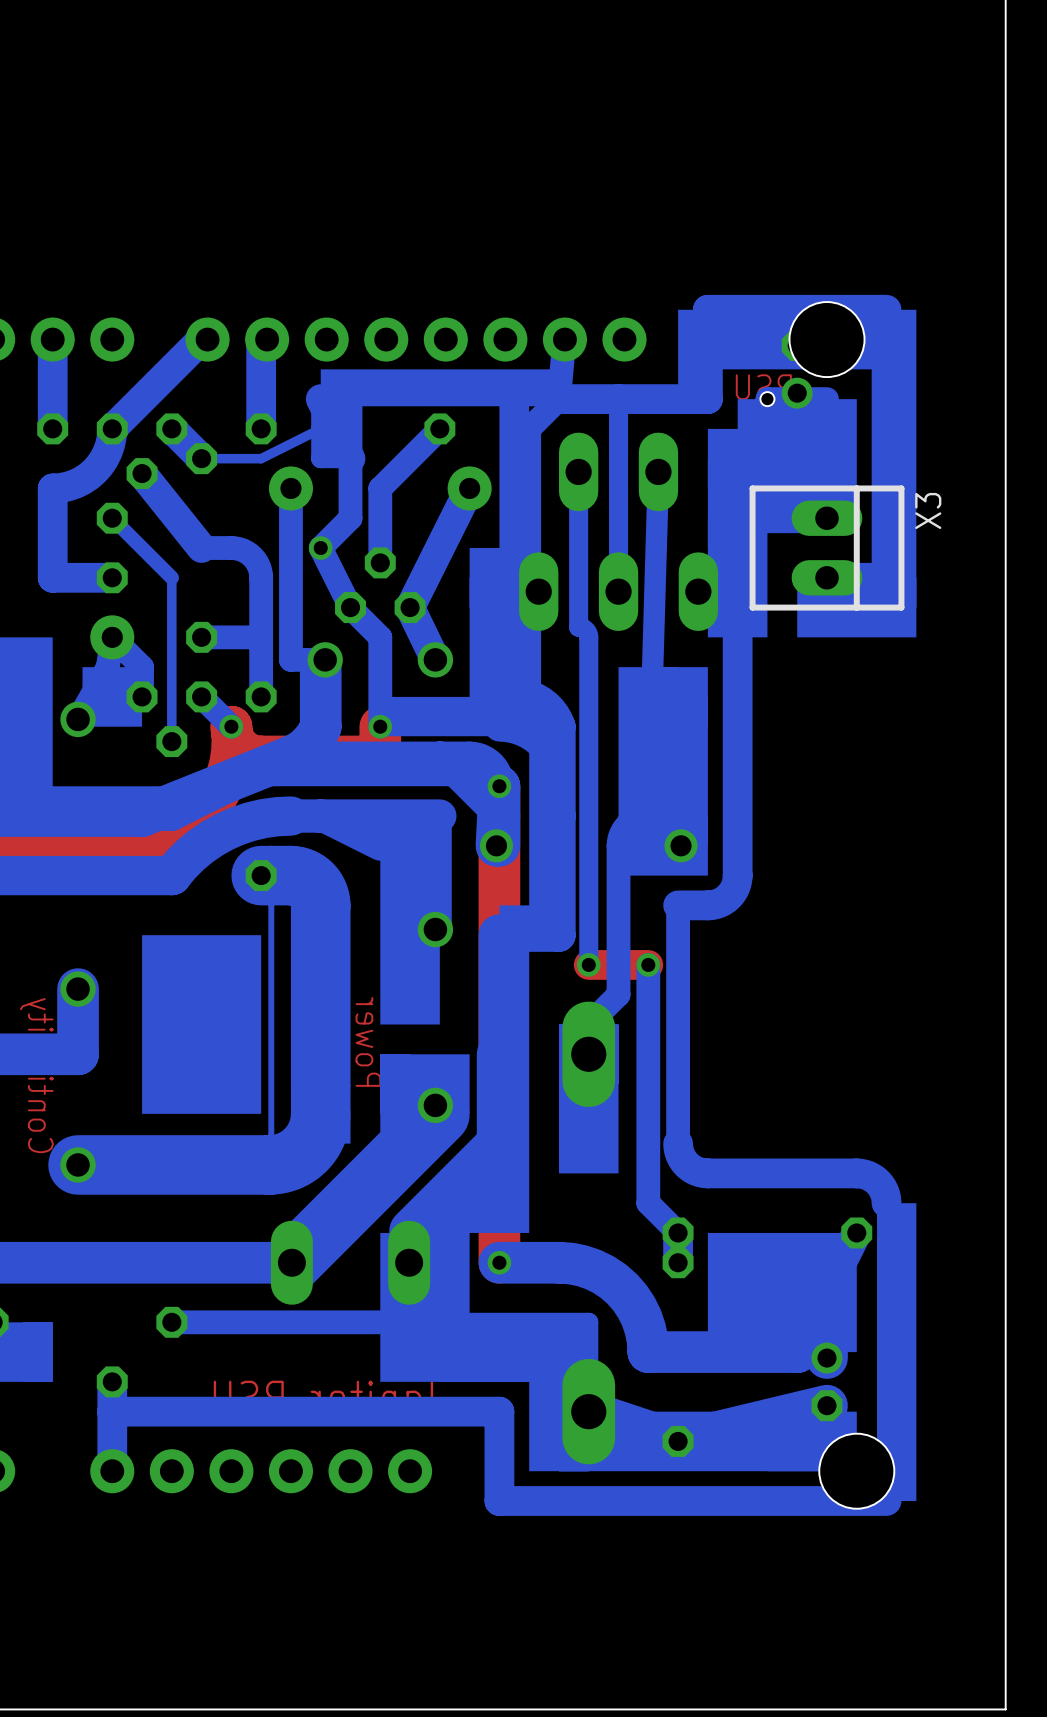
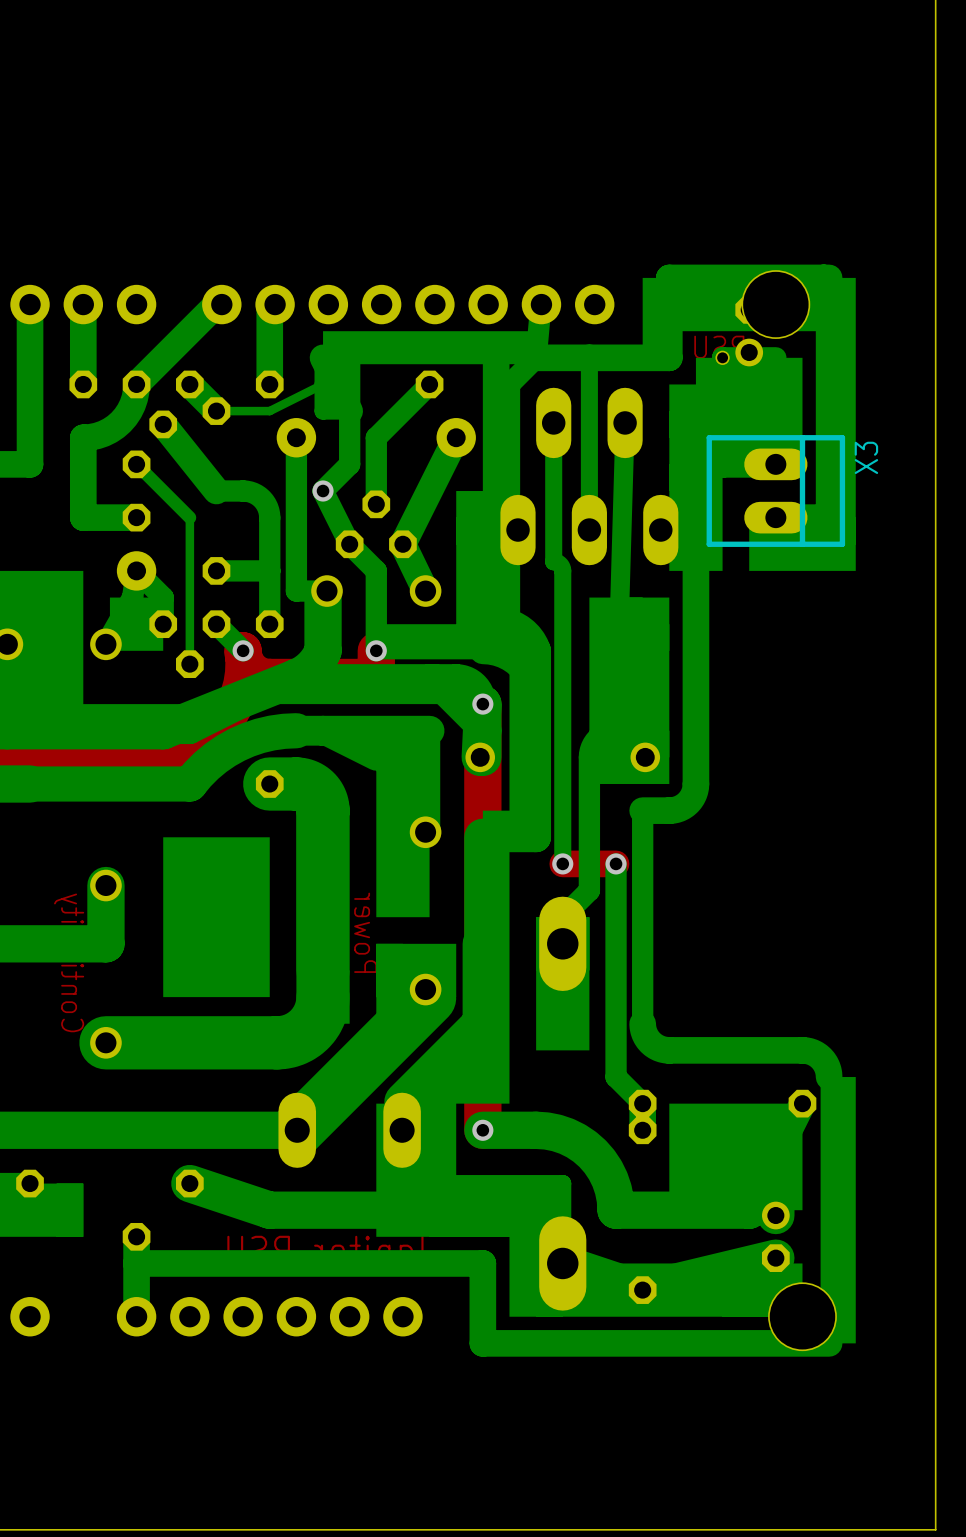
bottom track: (271, 875) (271, 1135) (269, 1164) -> none
bottom track: (410, 1322) (171, 1322) -> (429, 1210) (269, 1210) (189, 1183)

